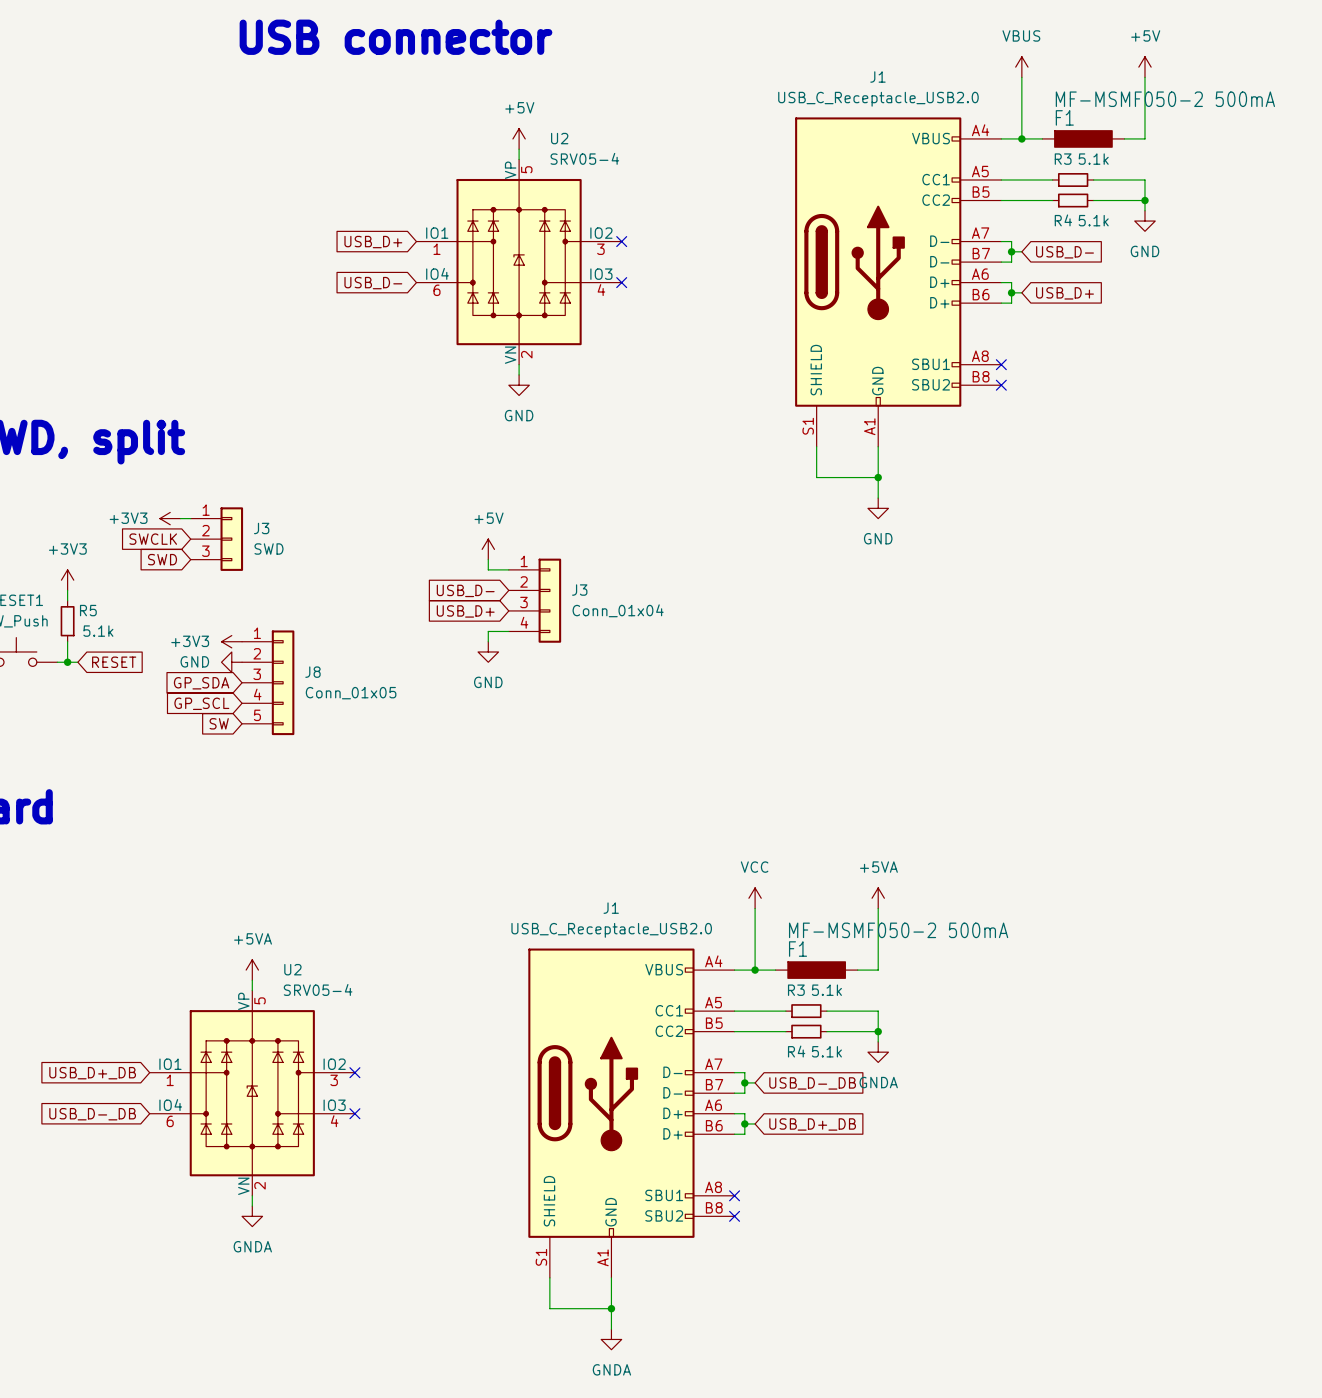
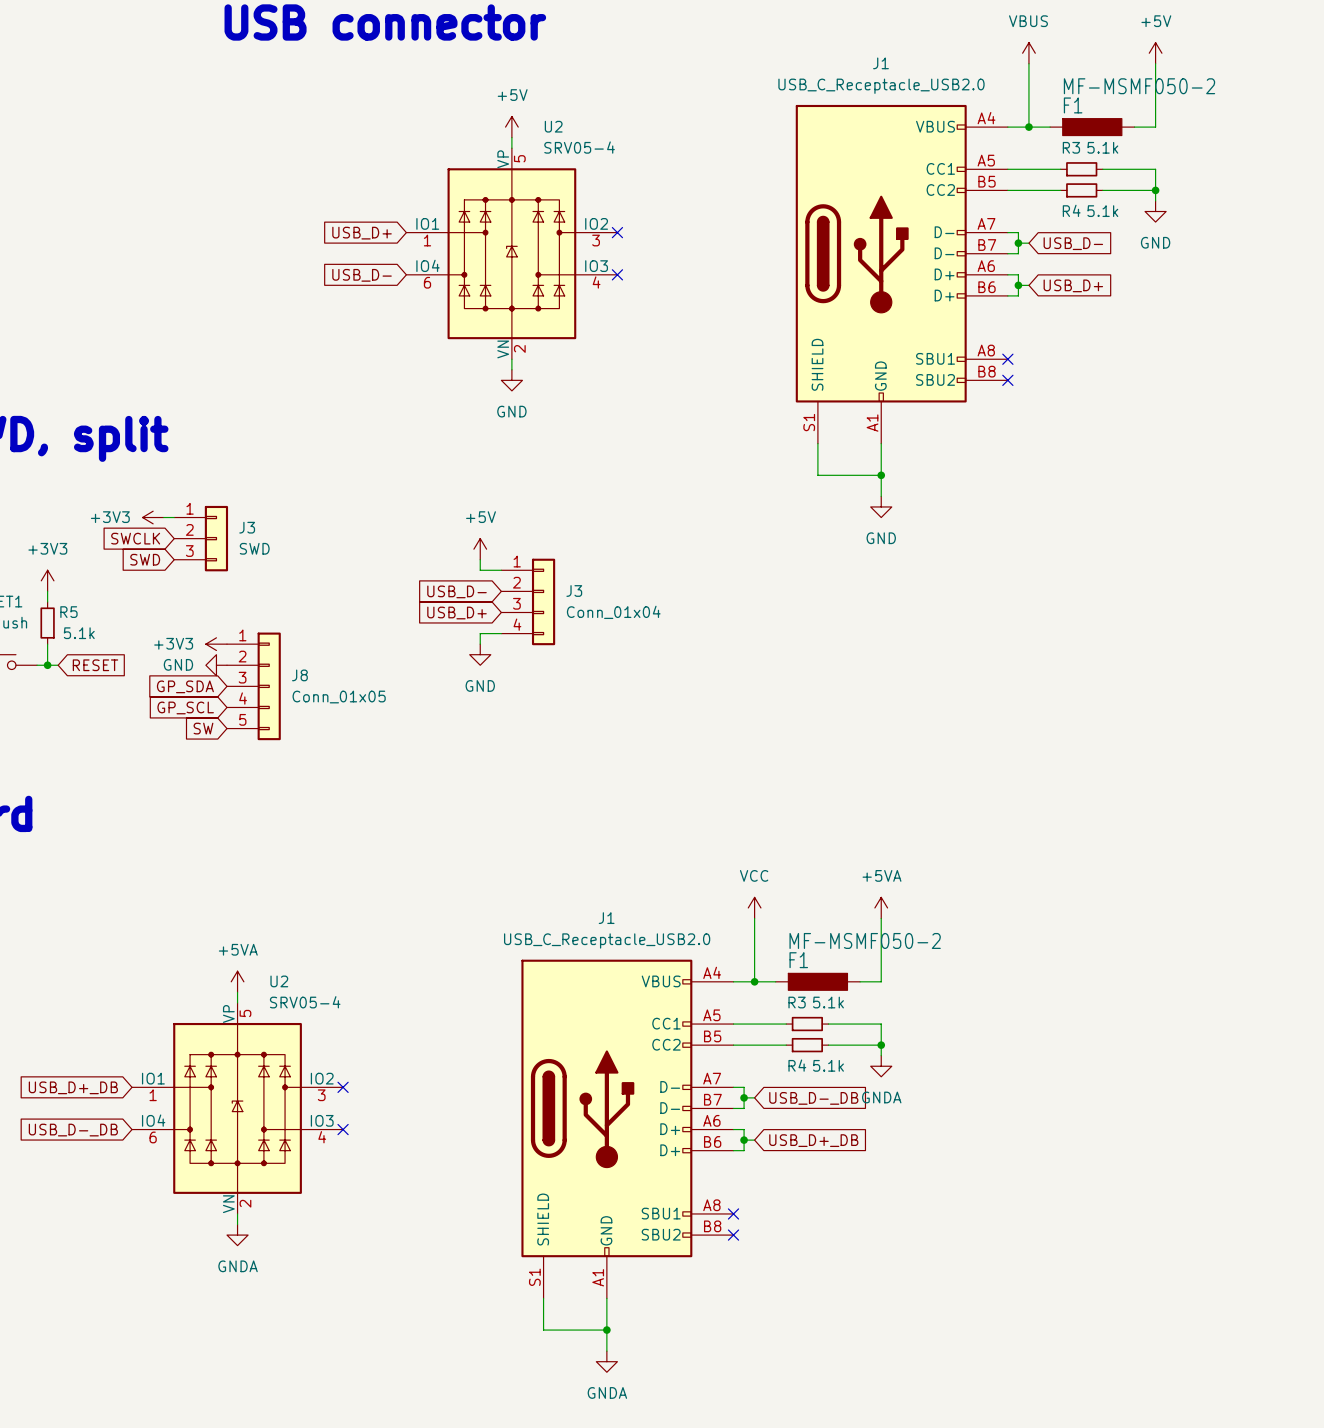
F1 value: MF-MSMF050-2 500mA (1165, 99) -> MF-MSMF050-2 (1139, 86)
F1 value: MF-MSMF050-2 500mA (898, 930) -> MF-MSMF050-2 (865, 940)

